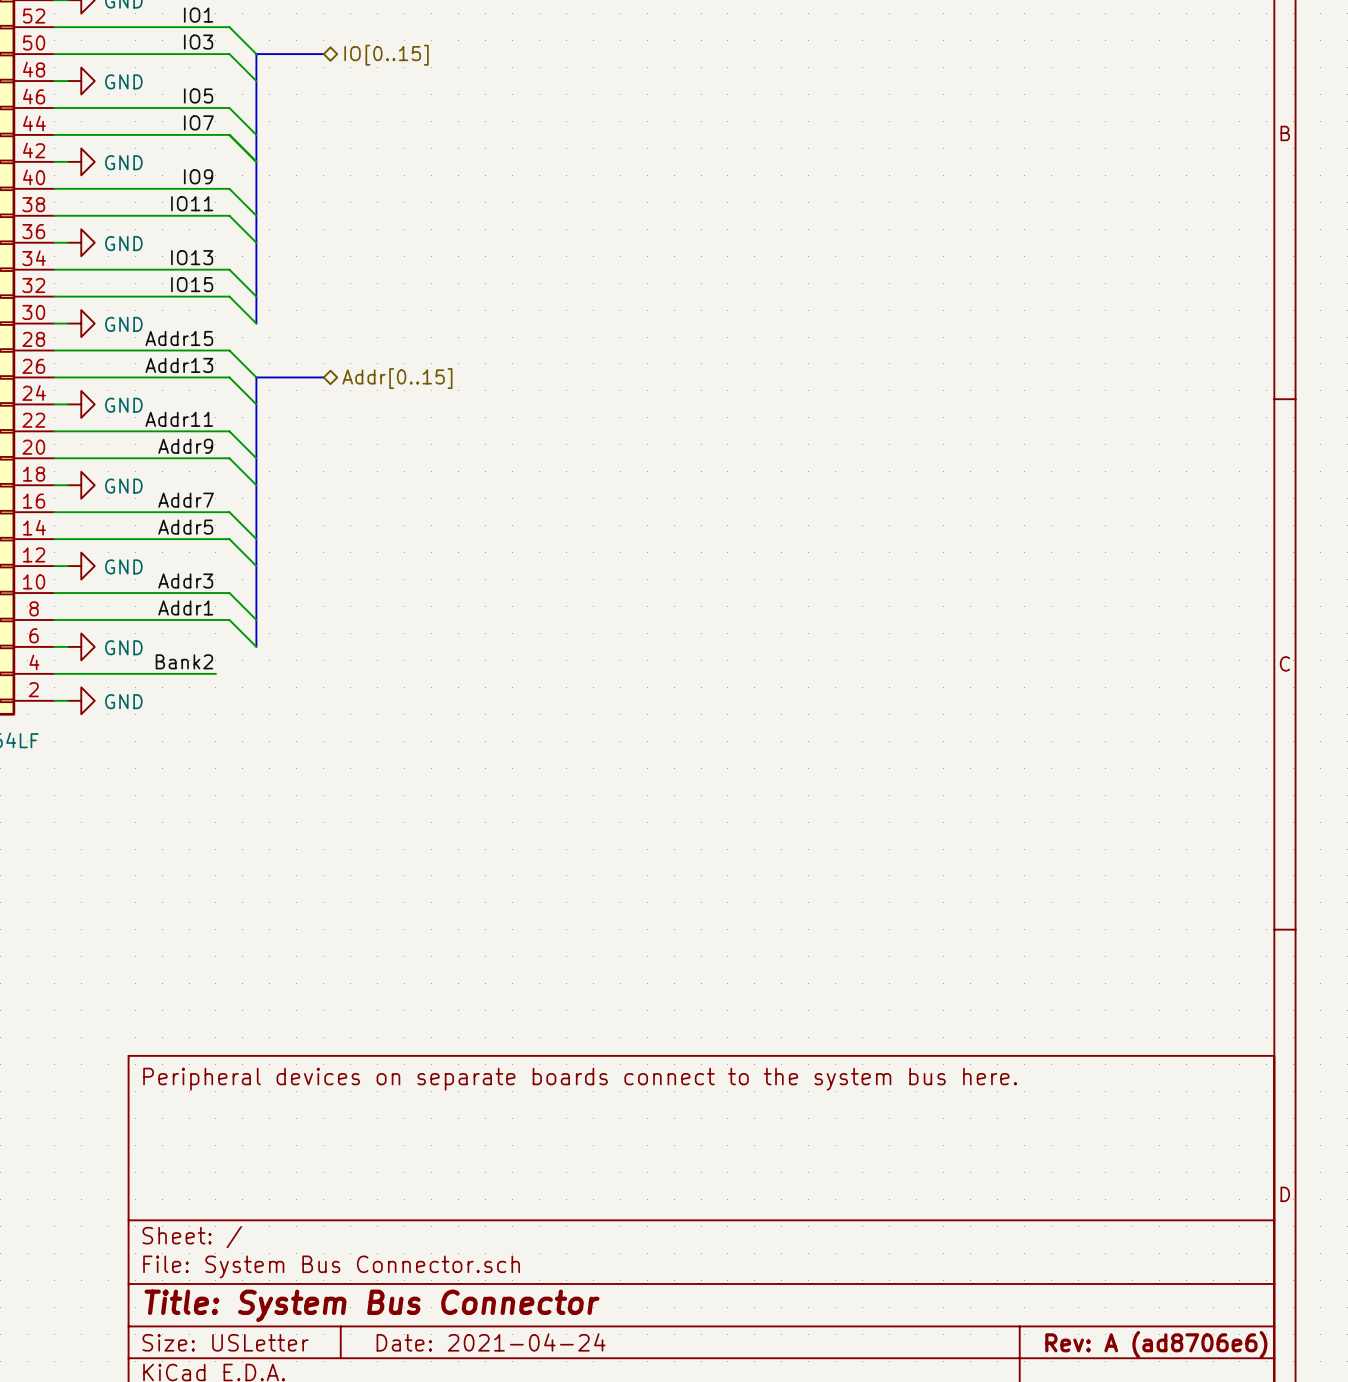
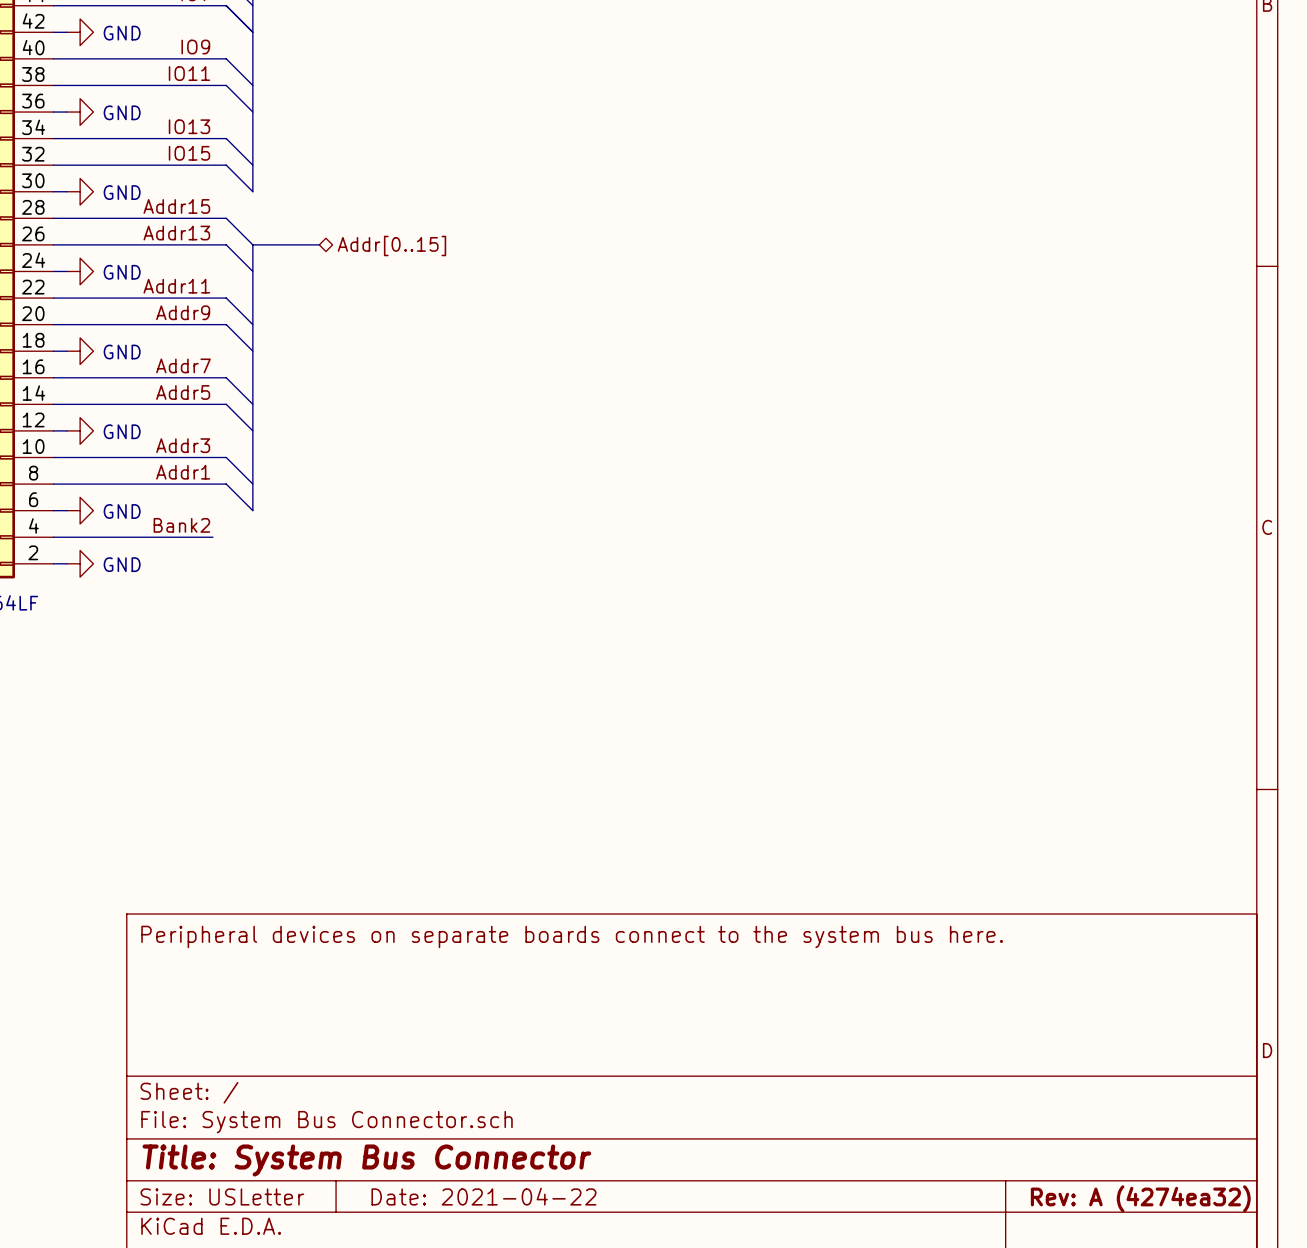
title block: Date: 2021-04-24 (491, 1342) -> Date: 2021-04-22 (483, 1196)
title block: Rev: A (ad8706e6) (1156, 1344) -> Rev: A (4274ea32) (1140, 1198)

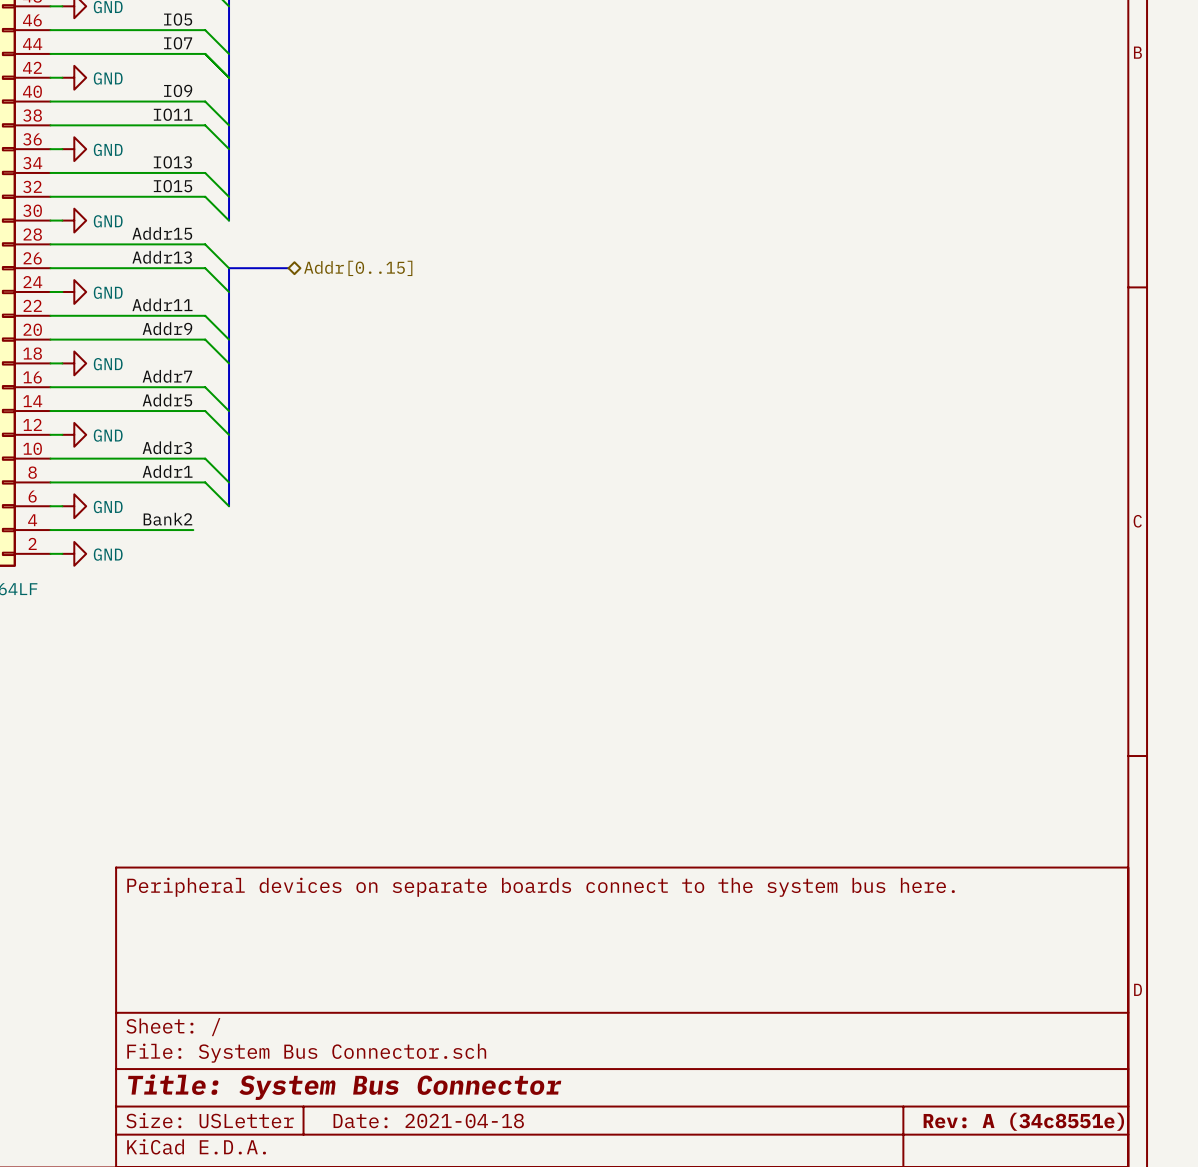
title block: Date: 2021-04-22 (483, 1196) -> Date: 2021-04-18 (428, 1121)
title block: Rev: A (4274ea32) (1140, 1198) -> Rev: A (34c8551e) (1023, 1121)

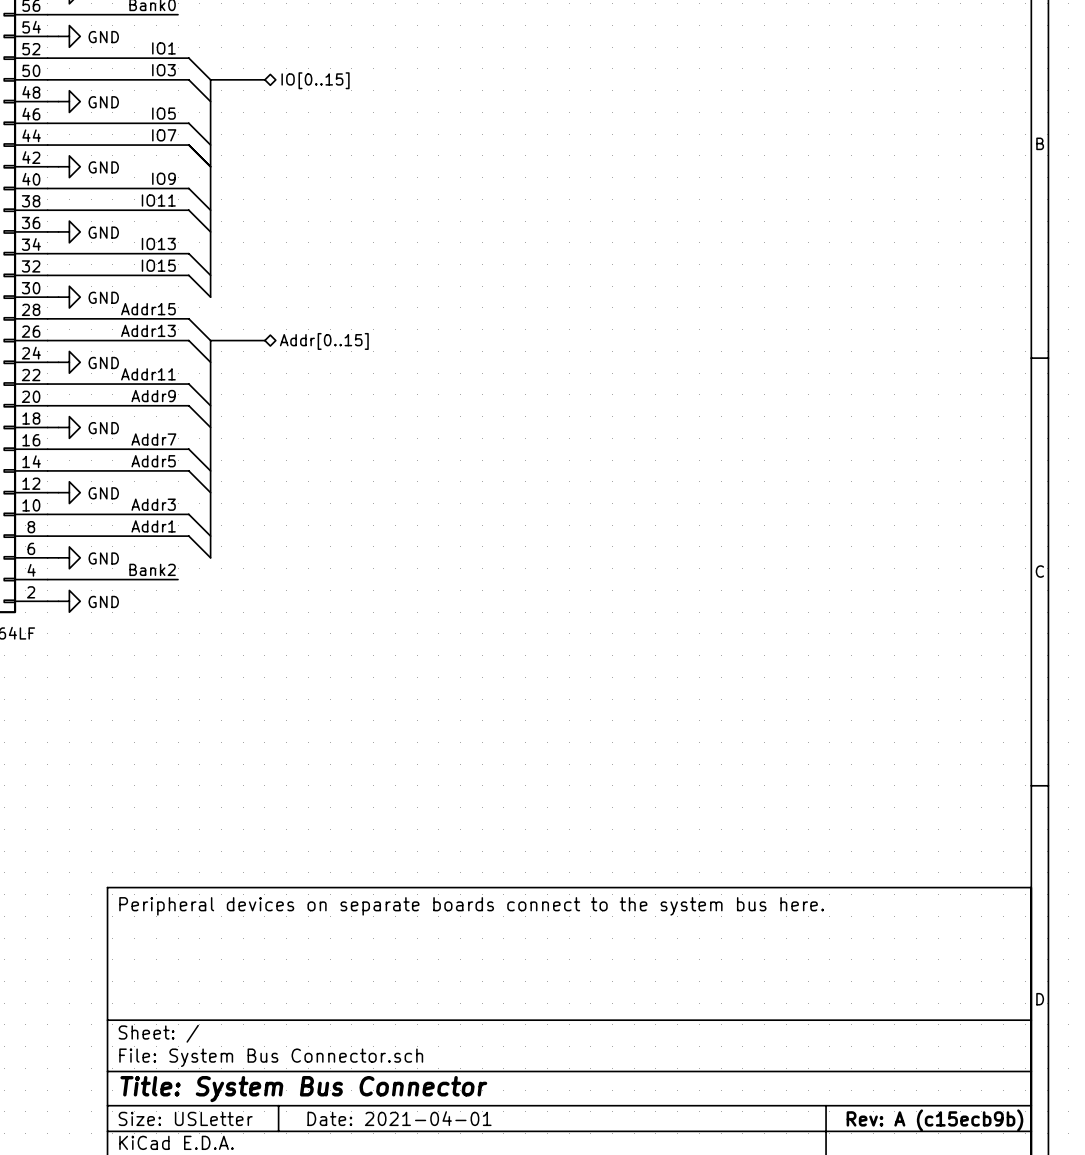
title block: Date: 2021-04-18 (428, 1121) -> Date: 2021-04-01 (399, 1118)
title block: Rev: A (34c8551e) (1023, 1121) -> Rev: A (c15ecb9b) (934, 1120)

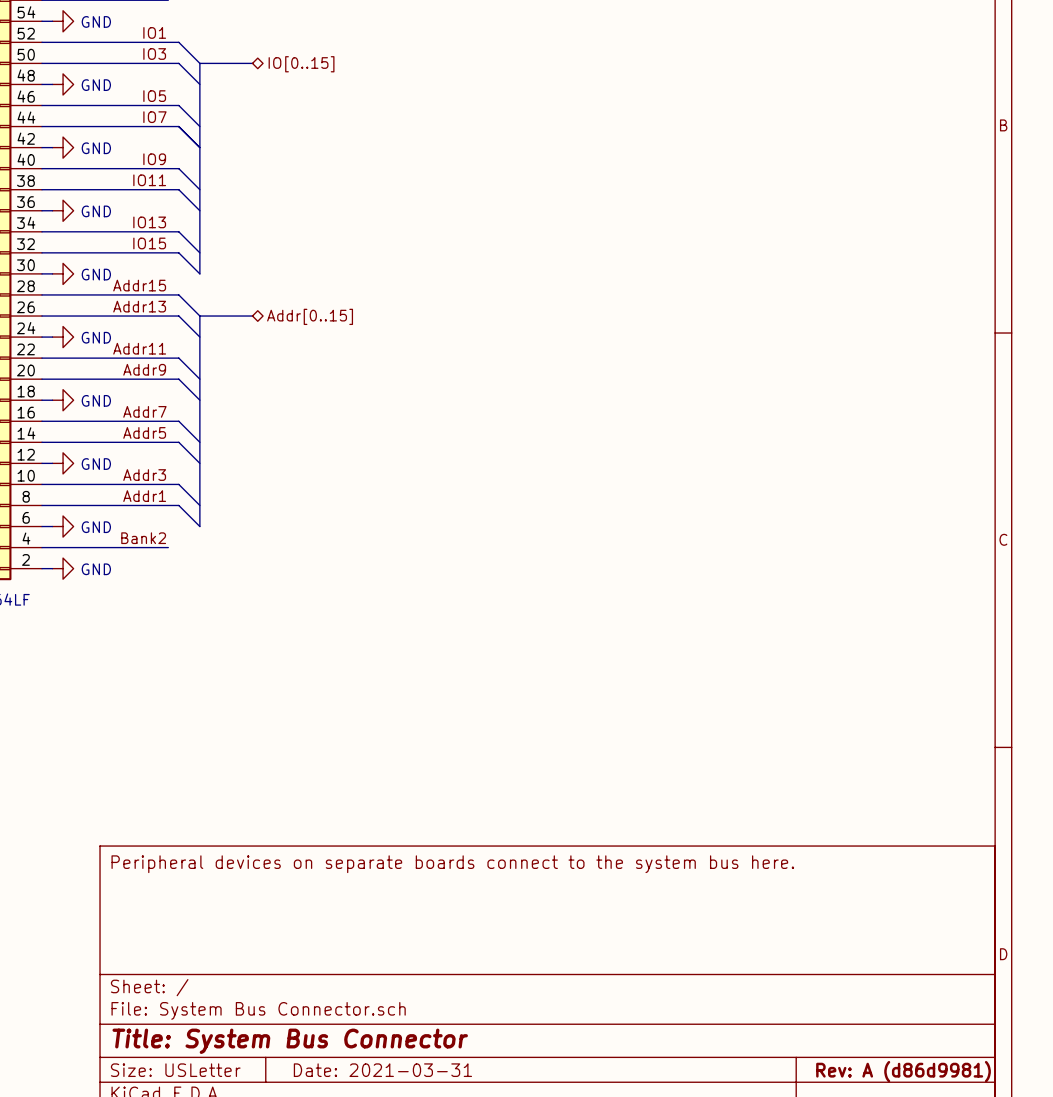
title block: Date: 2021-04-01 (399, 1118) -> Date: 2021-03-31 (382, 1070)
title block: Rev: A (c15ecb9b) (934, 1120) -> Rev: A (d86d9981) (903, 1071)

